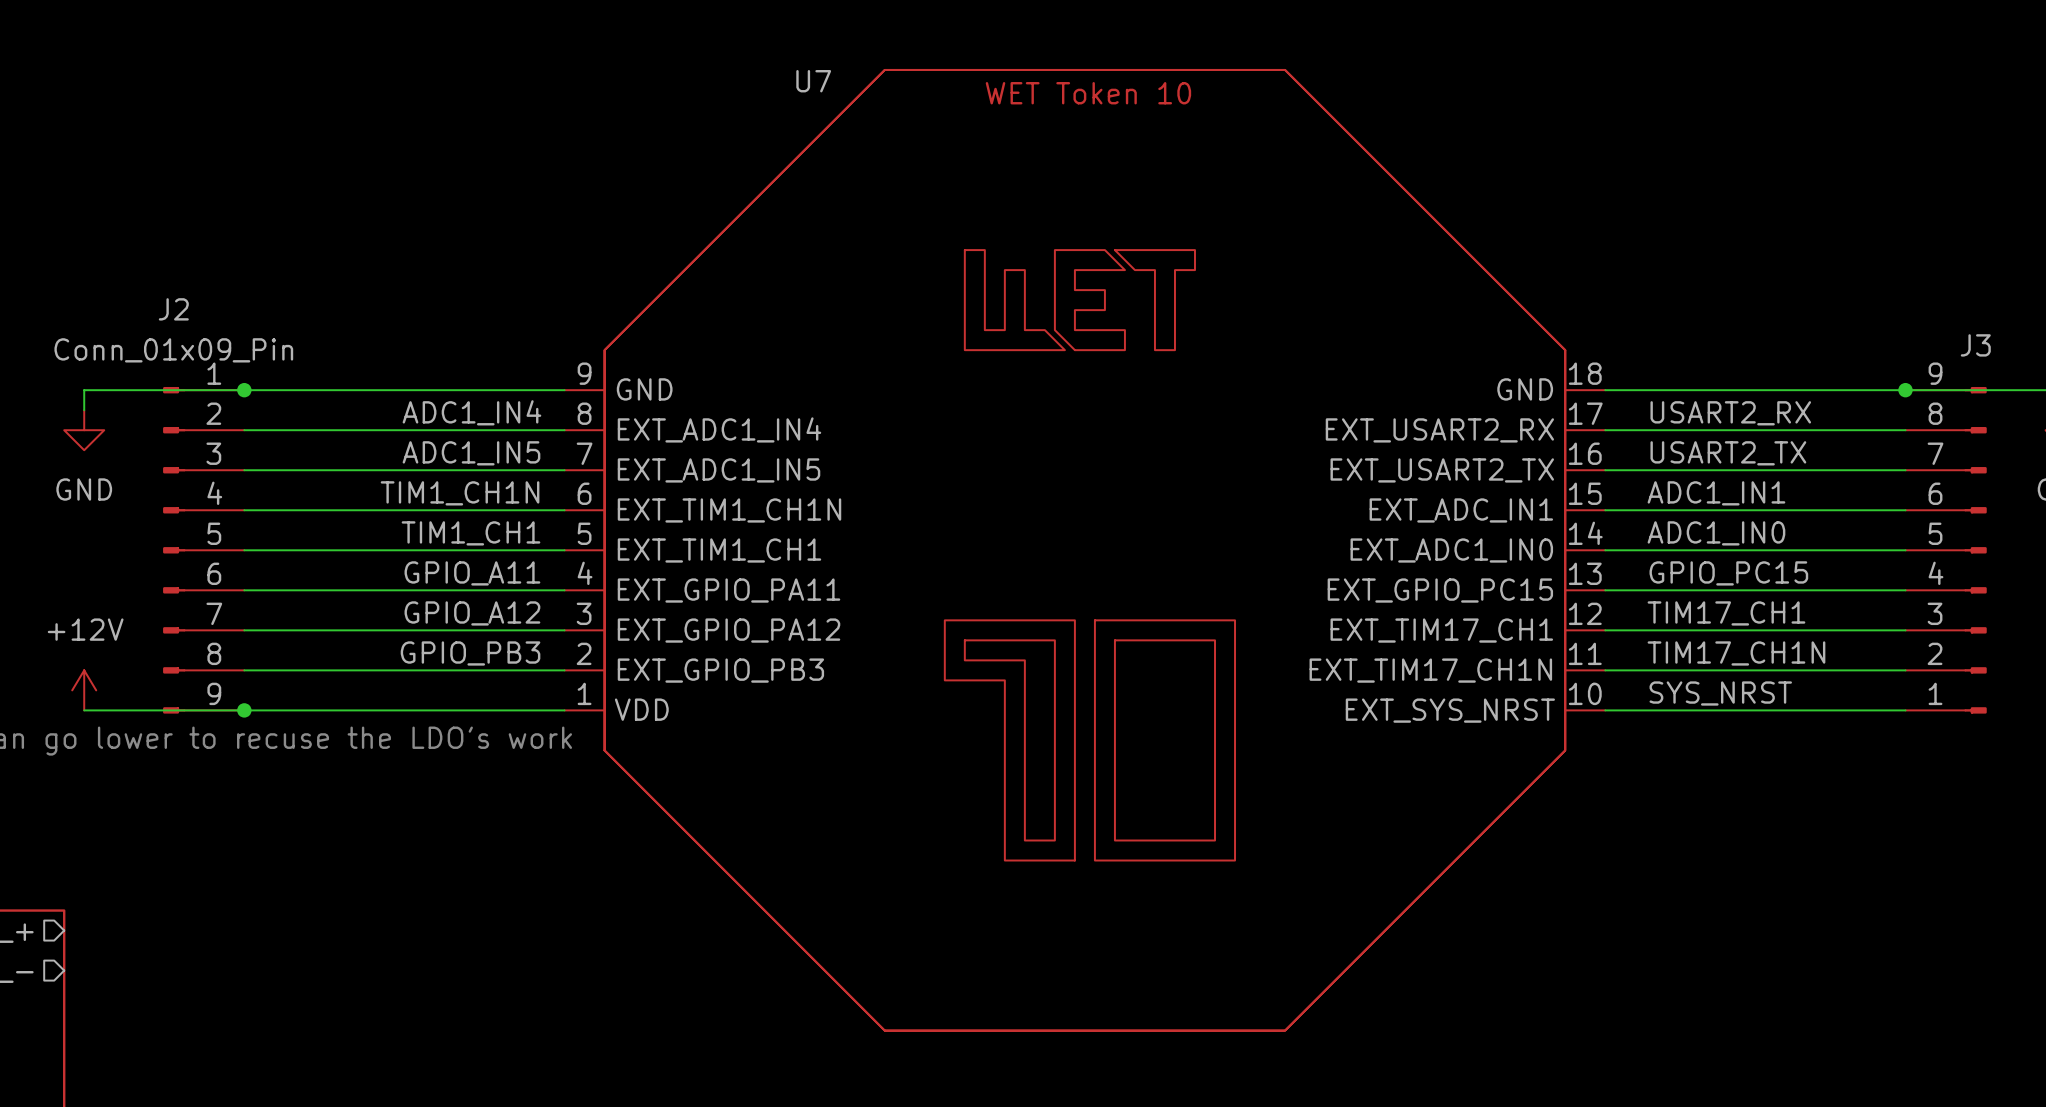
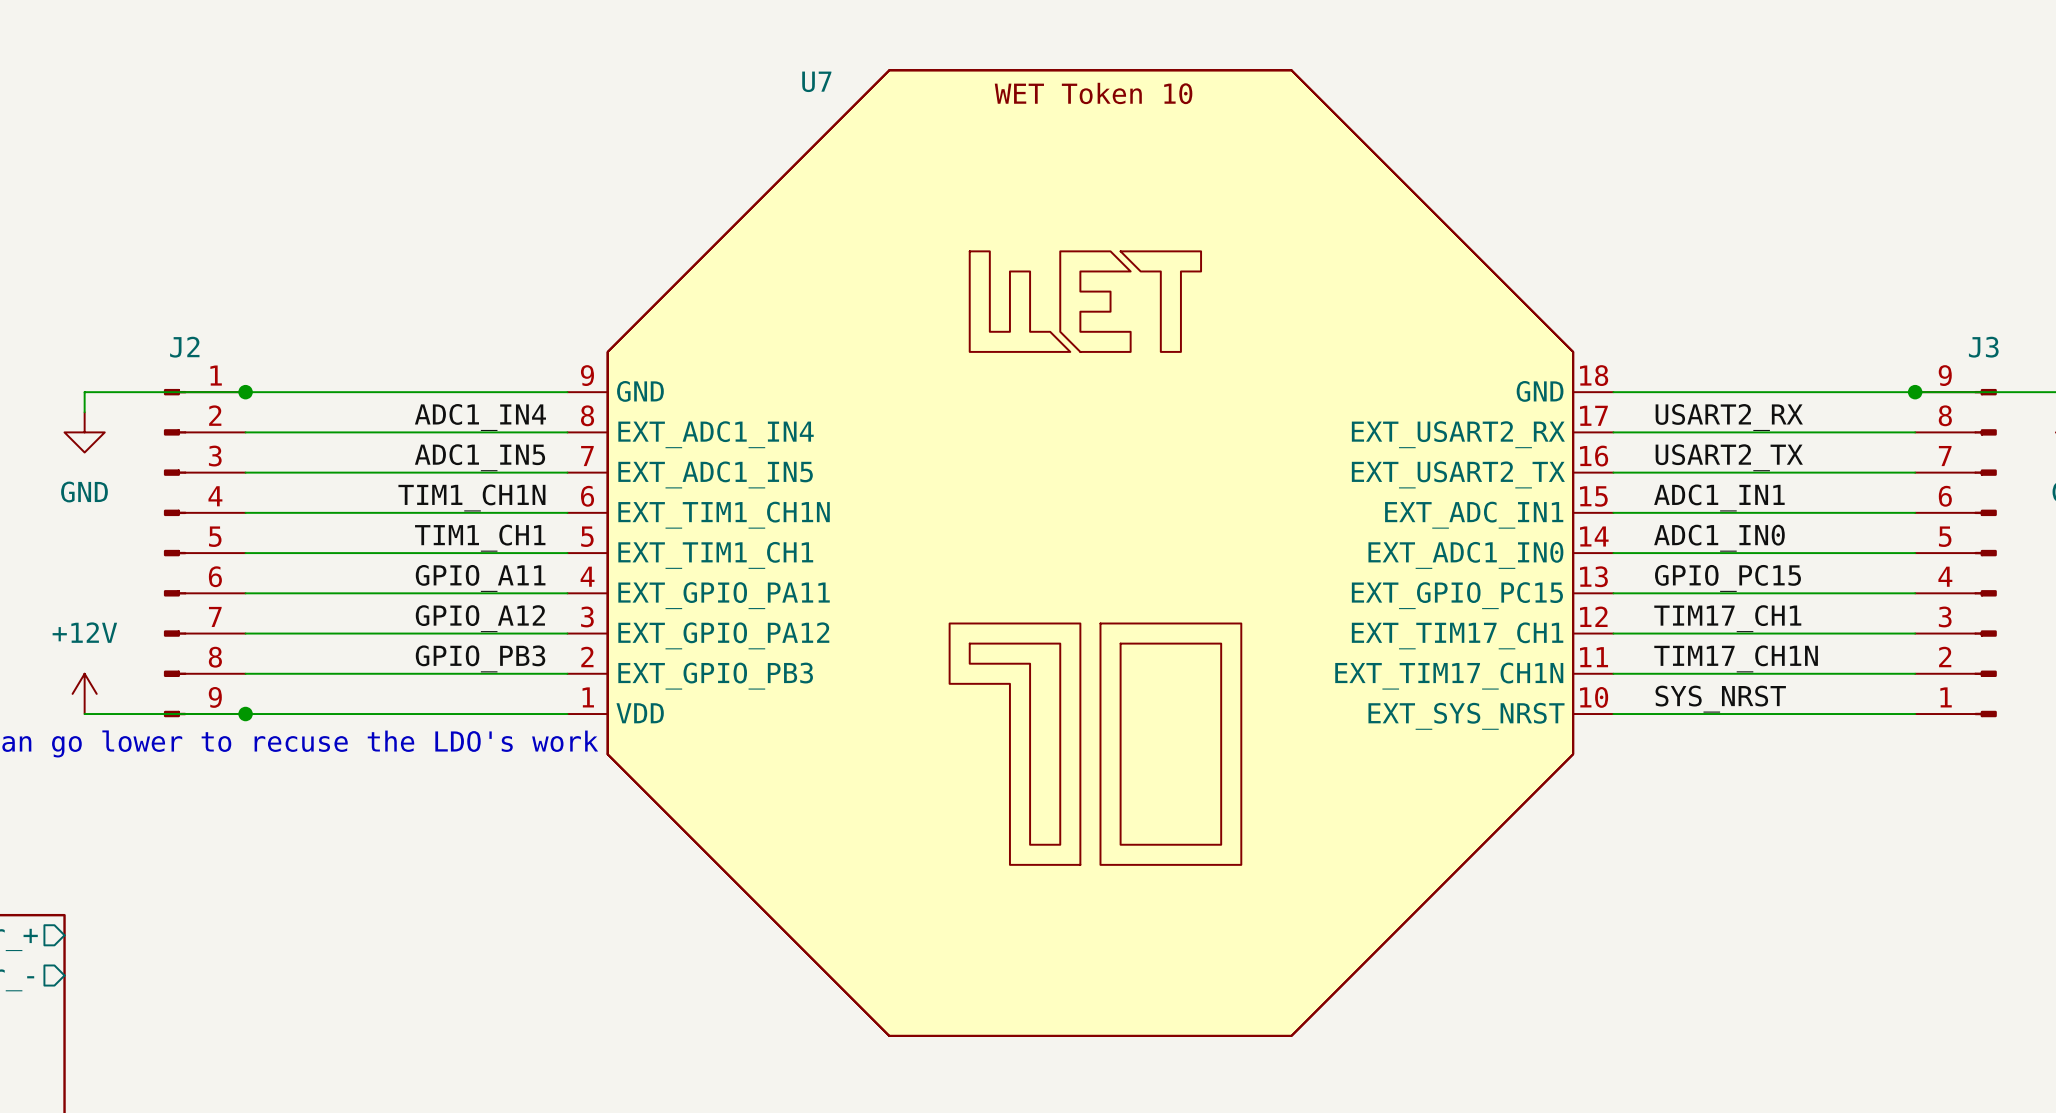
J2 name position: J2 (173, 309) -> J2 (184, 347)
J2 value: Conn_01x09_Pin (173, 350) -> none

